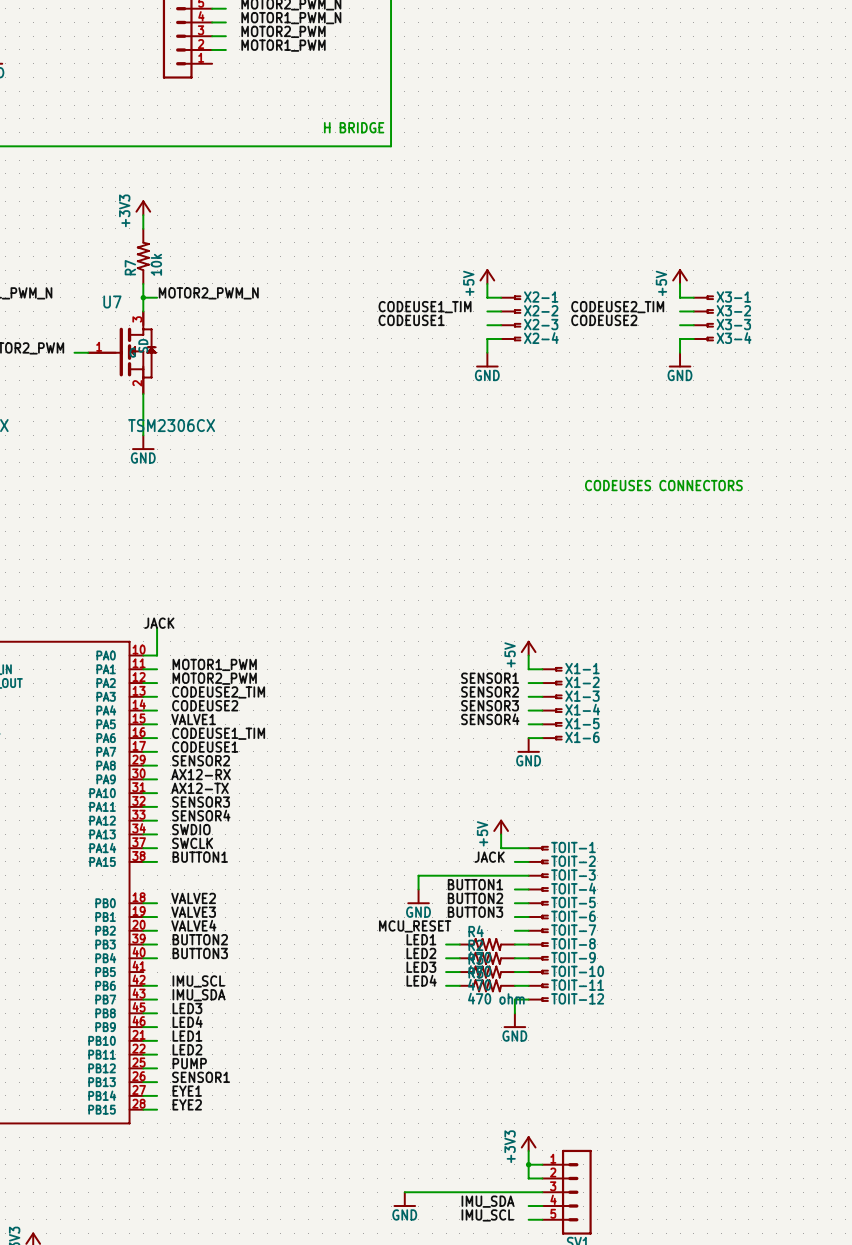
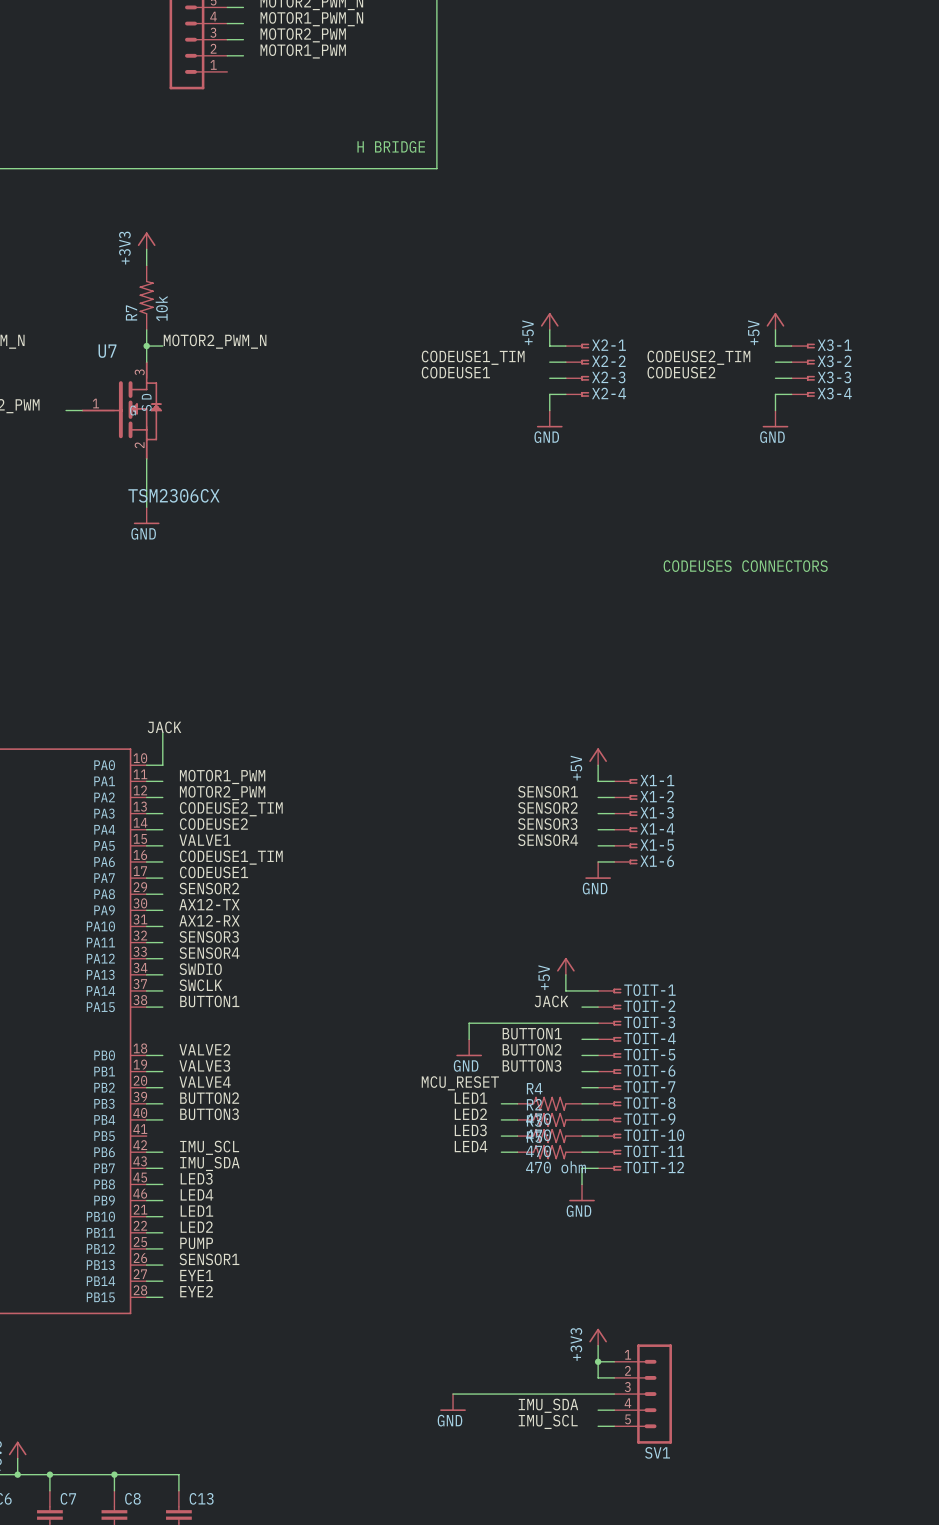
label: AX12-RX (201, 774) -> AX12-TX (209, 904)
label: AX12-TX (200, 788) -> AX12-RX (209, 920)

